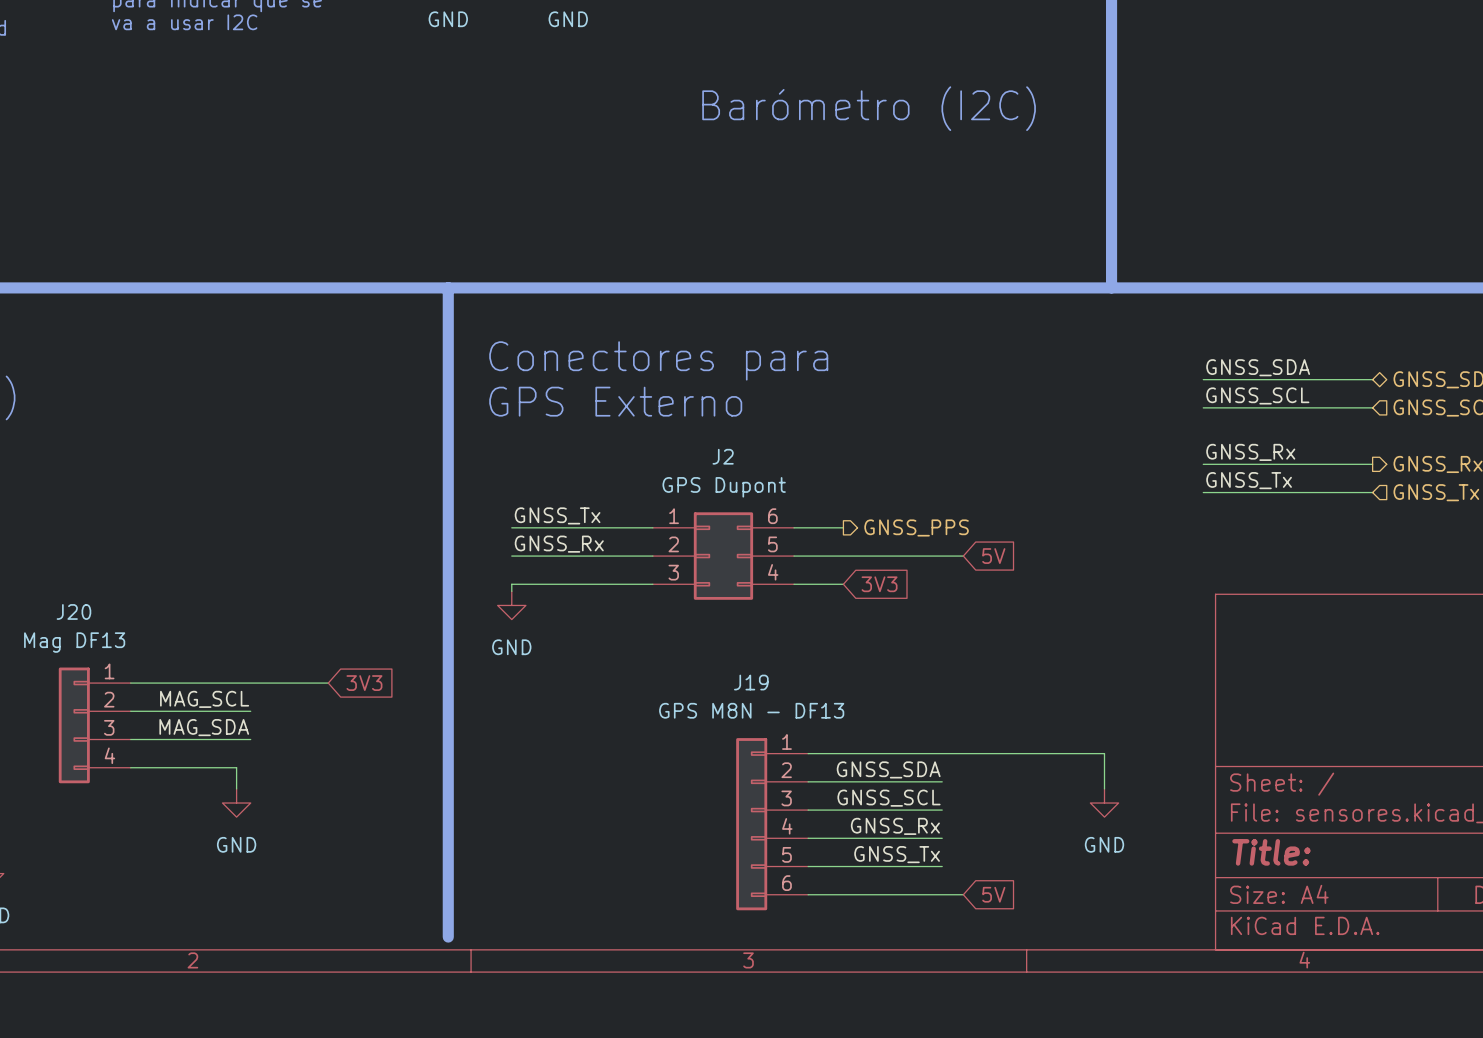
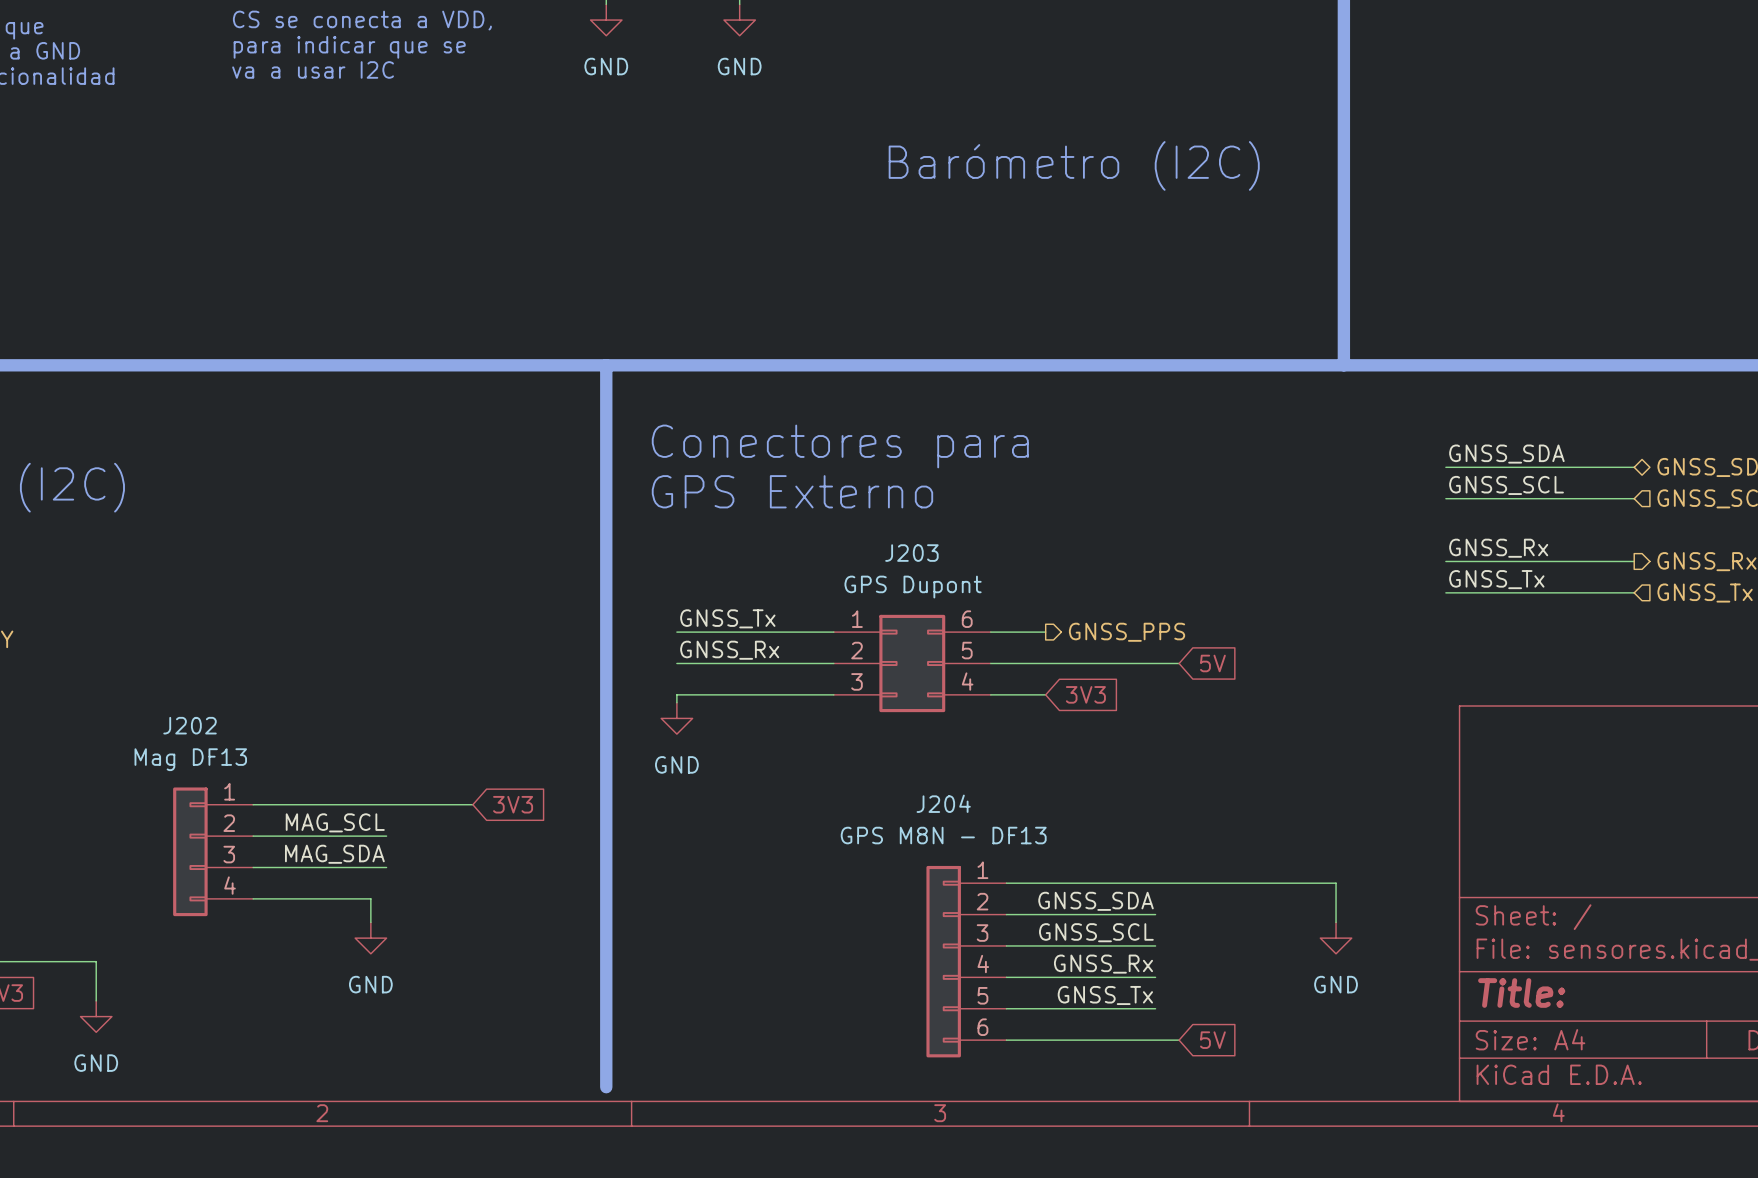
J2 name: J2 (723, 456) -> J203 (911, 553)
J20 name: J20 (73, 611) -> J202 (190, 725)
J19 name: J19 (751, 682) -> J204 (943, 803)

